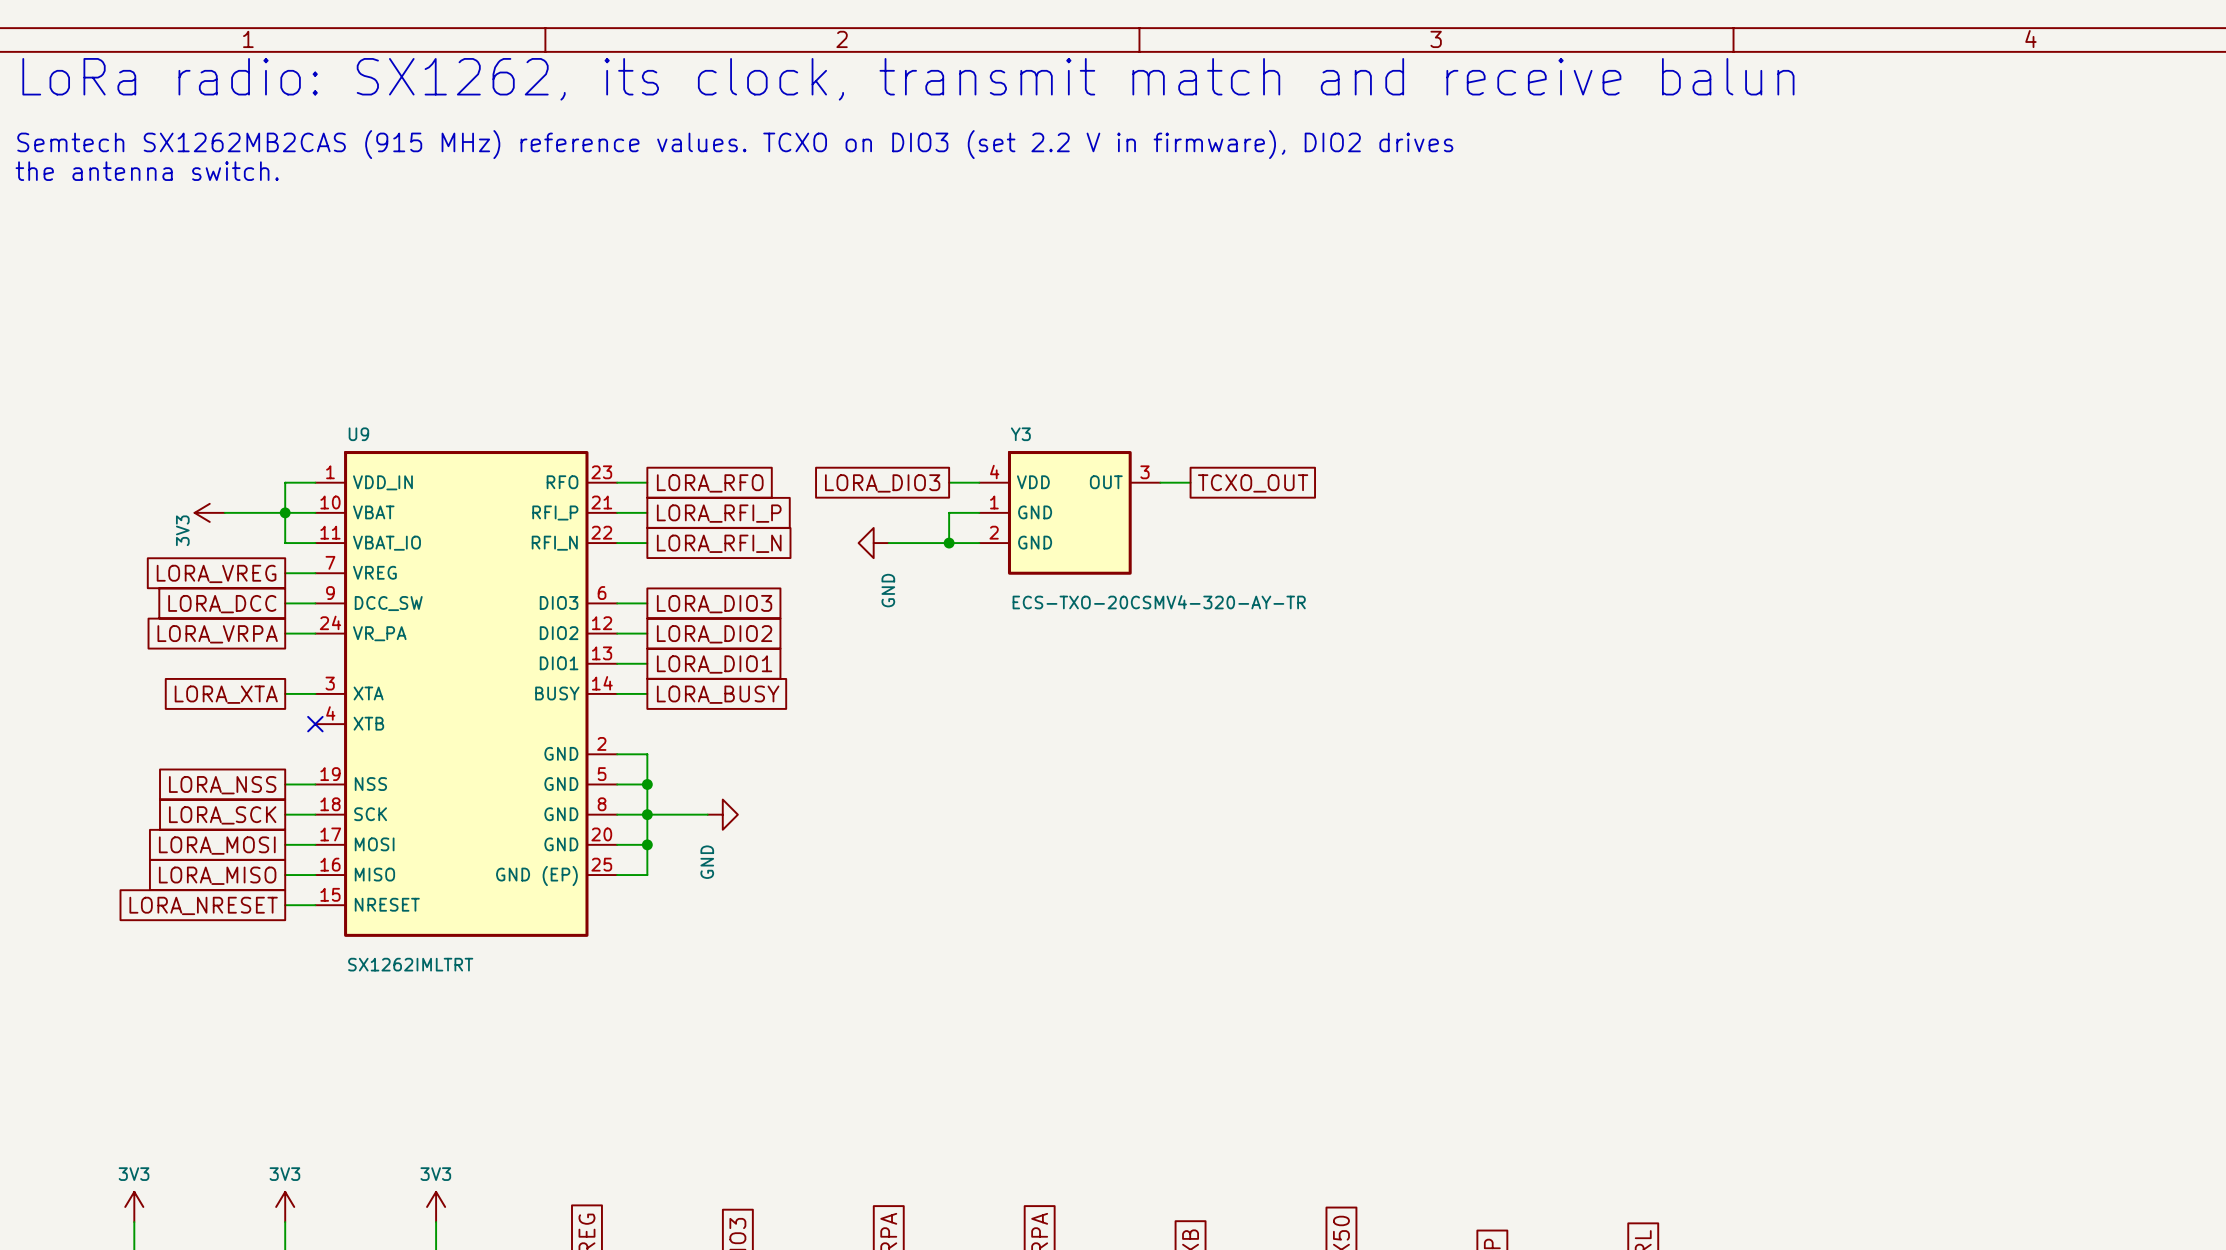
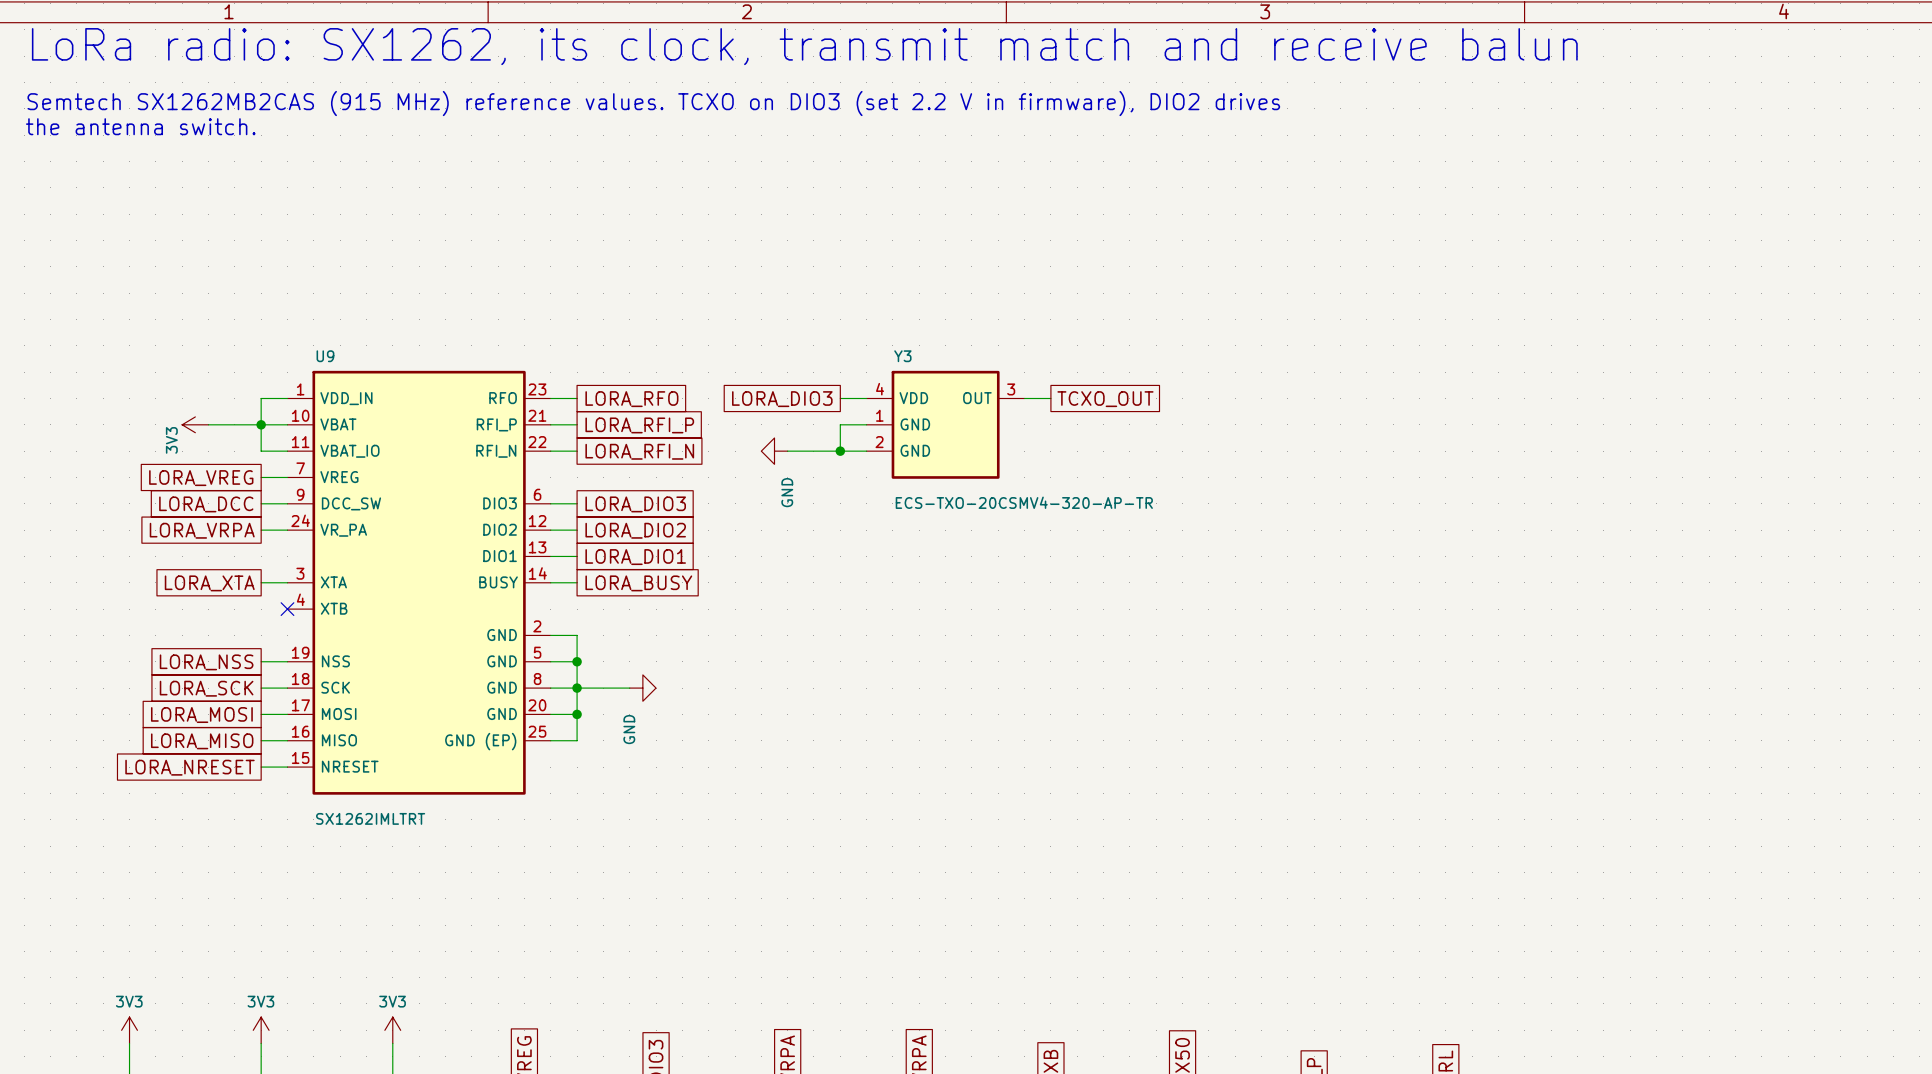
Y3 value: ECS-TXO-20CSMV4-320-AY-TR (1159, 602) -> ECS-TXO-20CSMV4-320-AP-TR (1024, 502)

